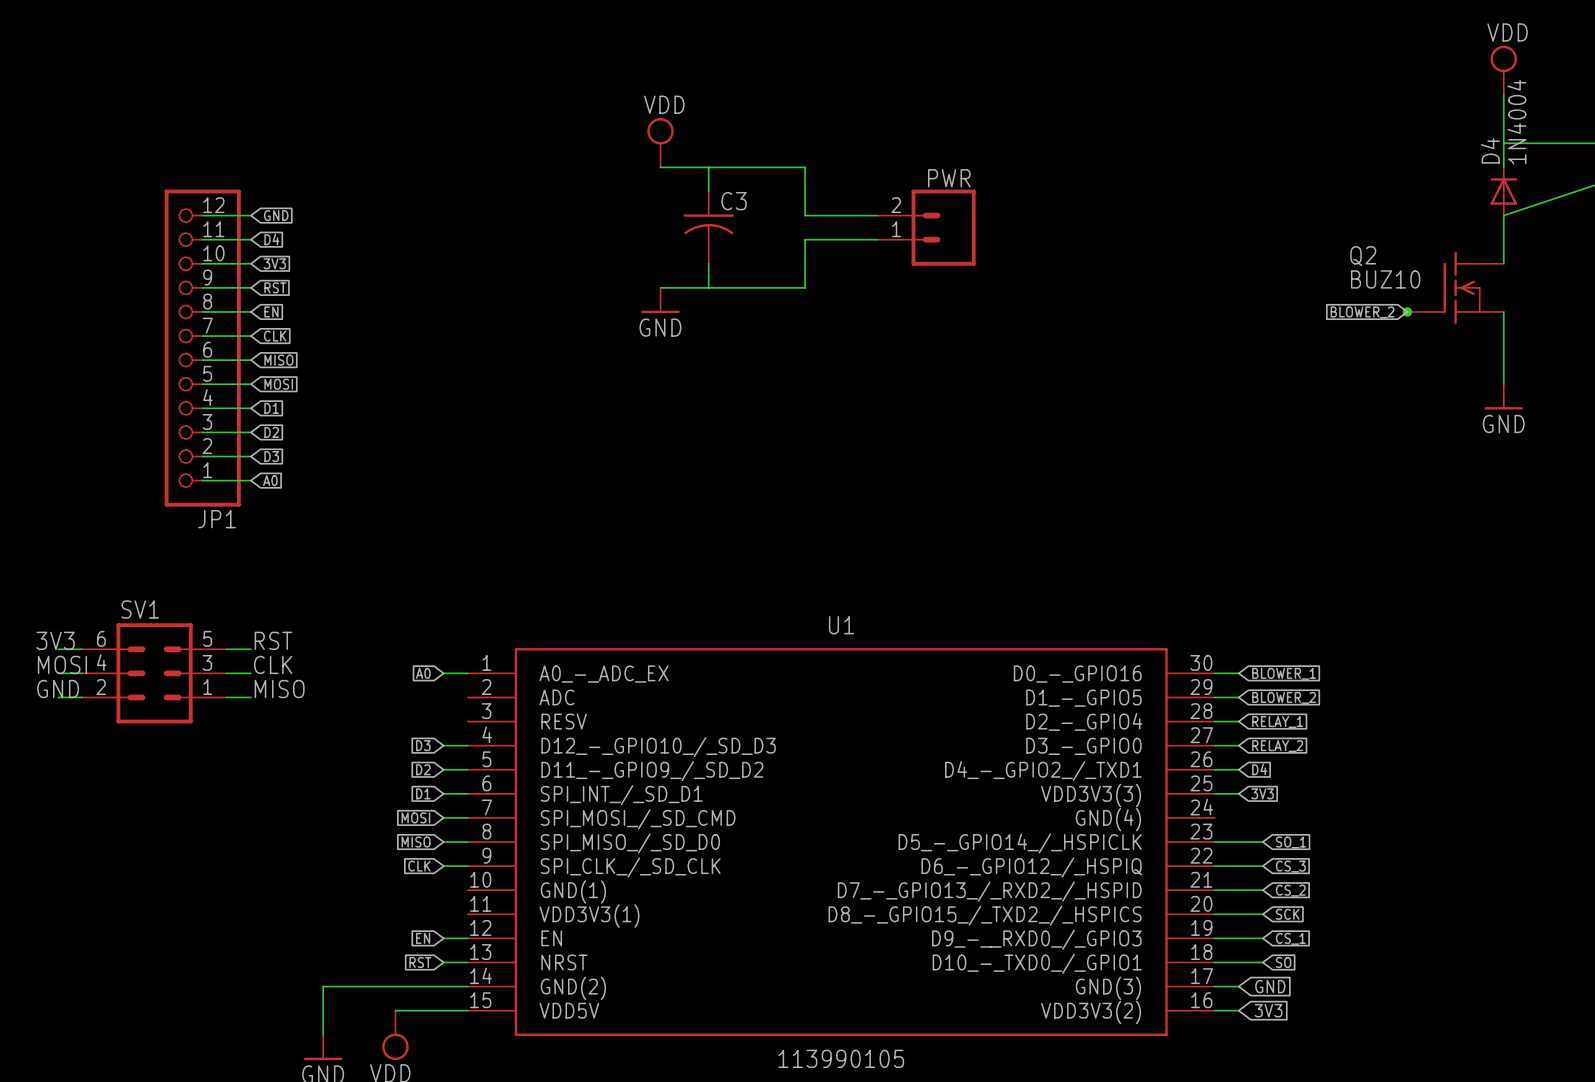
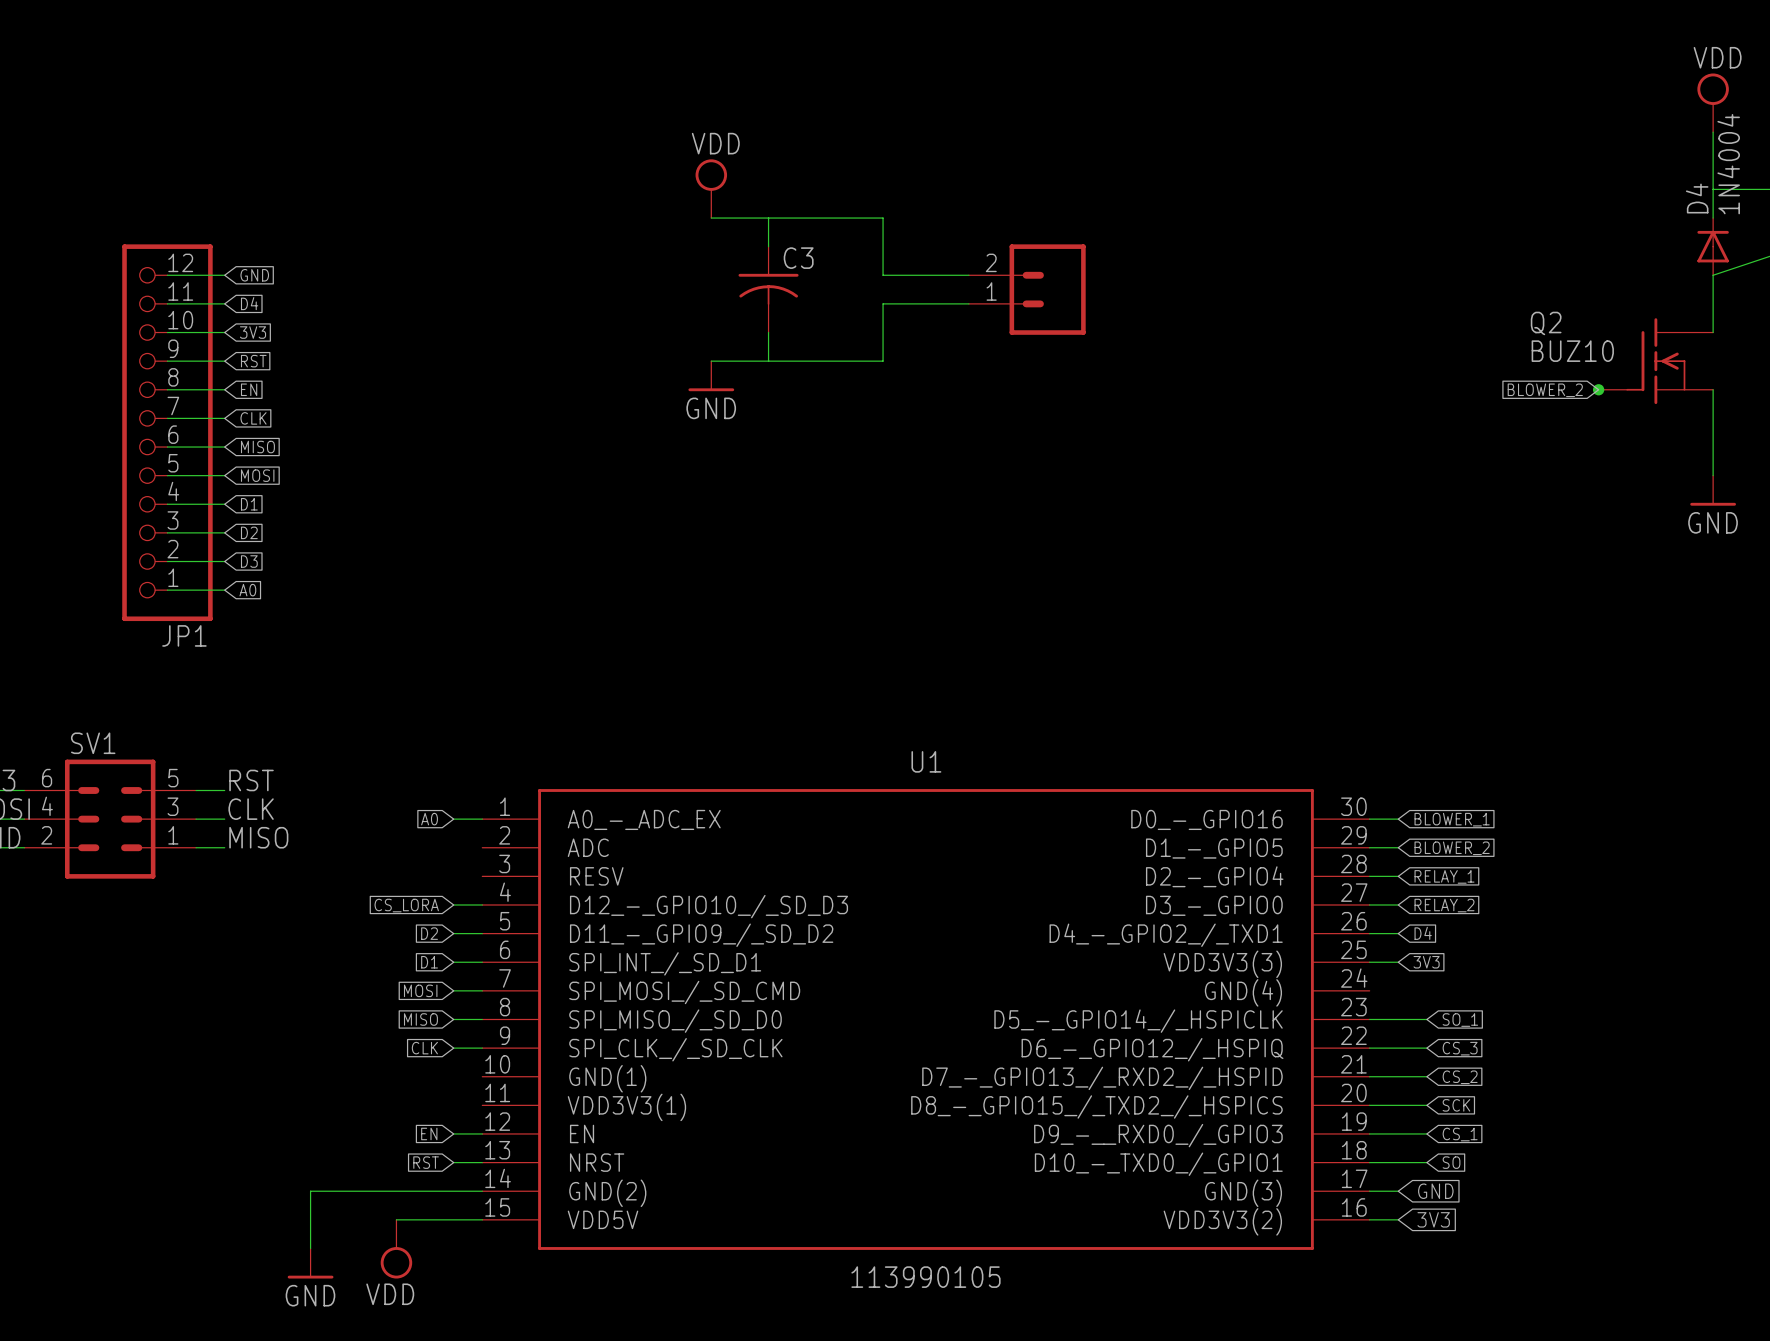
PWR name: PWR (949, 178) -> none
global label: D3 (423, 745) -> CS_LORA (406, 905)

